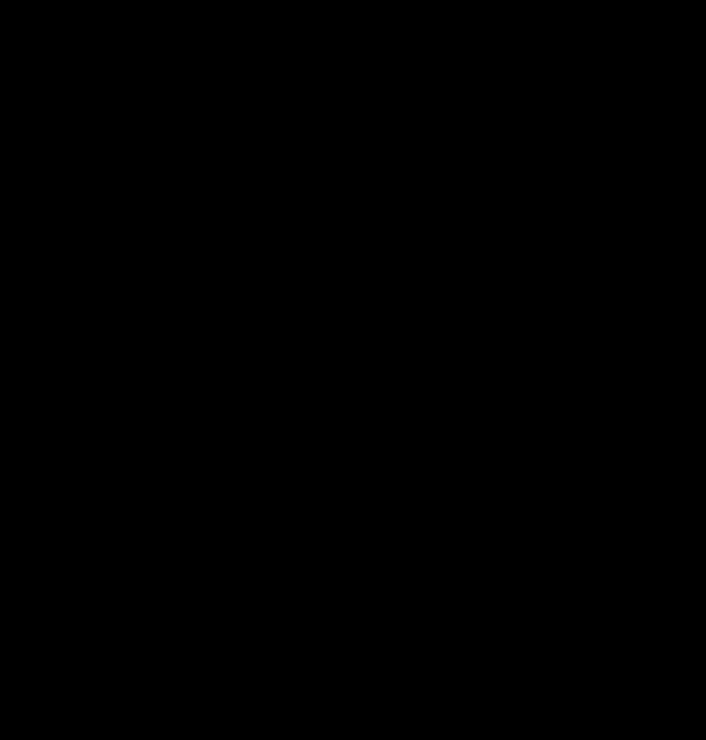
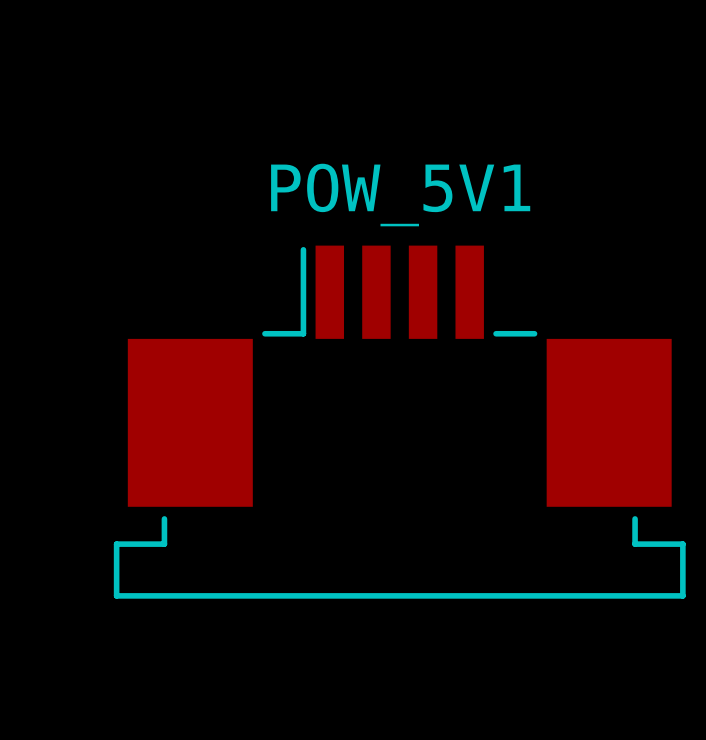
POW_5V1: none -> (399, 422)

